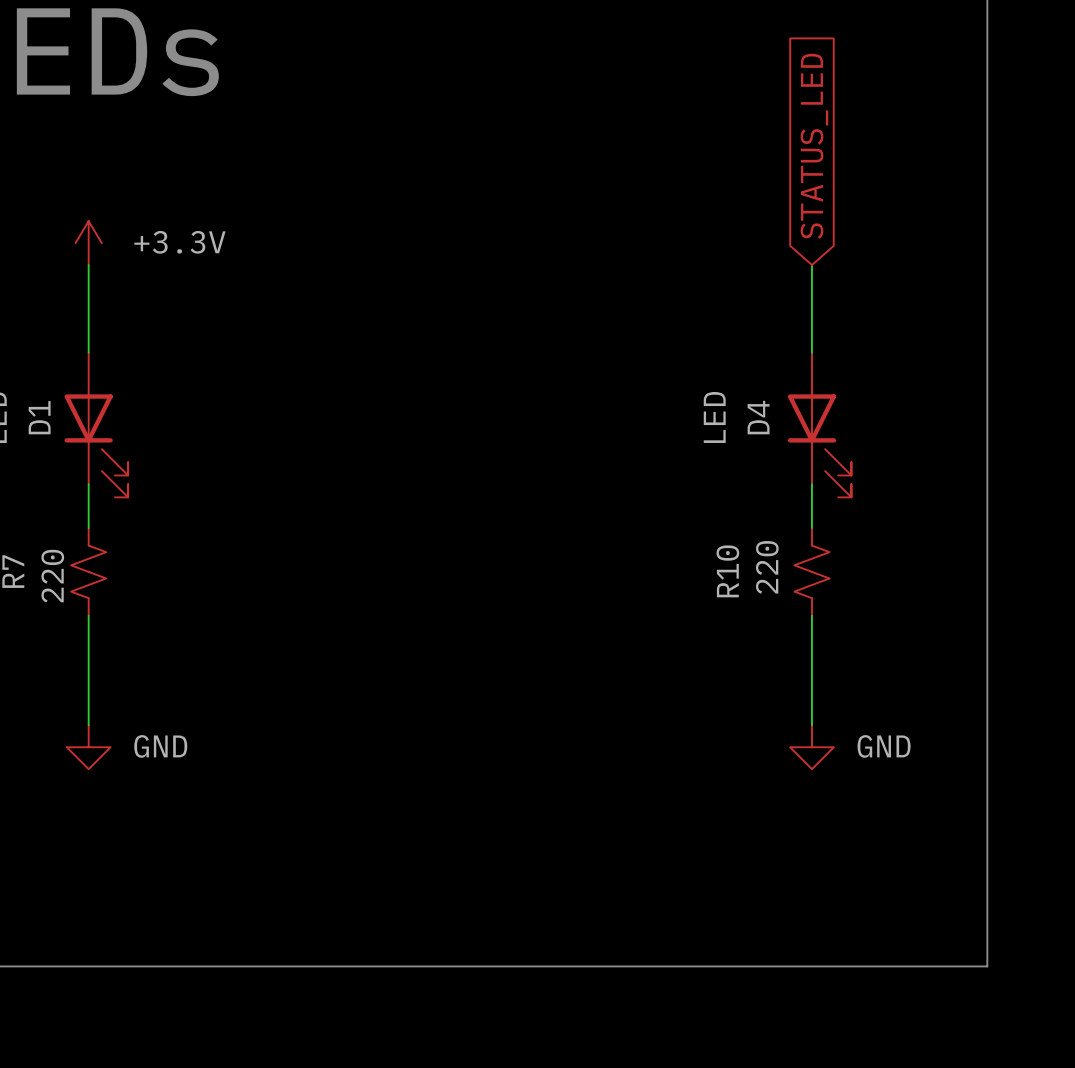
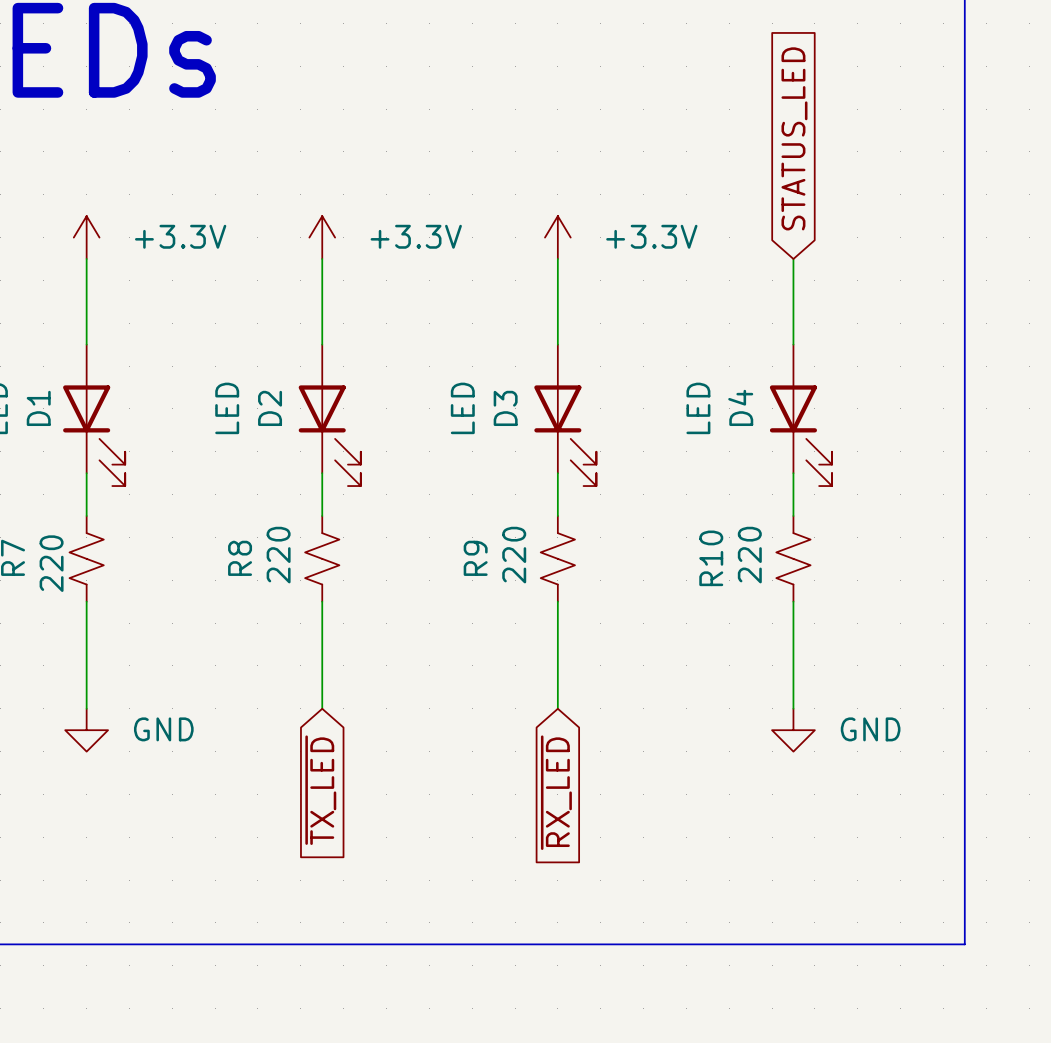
power symbol: none -> +3.3V (322, 237)
power symbol: none -> +3.3V (557, 237)
wire: none -> (322, 258) (322, 344)
wire: none -> (557, 258) (557, 344)
D2: none -> LED (329, 415)
D3: none -> LED (565, 415)
wire: none -> (322, 473) (322, 516)
wire: none -> (557, 473) (557, 516)
R8: none -> 220 (322, 558)
R9: none -> 220 (557, 558)
wire: none -> (322, 601) (322, 708)
wire: none -> (557, 601) (557, 708)
global label: none -> ~{TX_LED} (320, 790)
global label: none -> ~{RX_LED} (556, 792)

